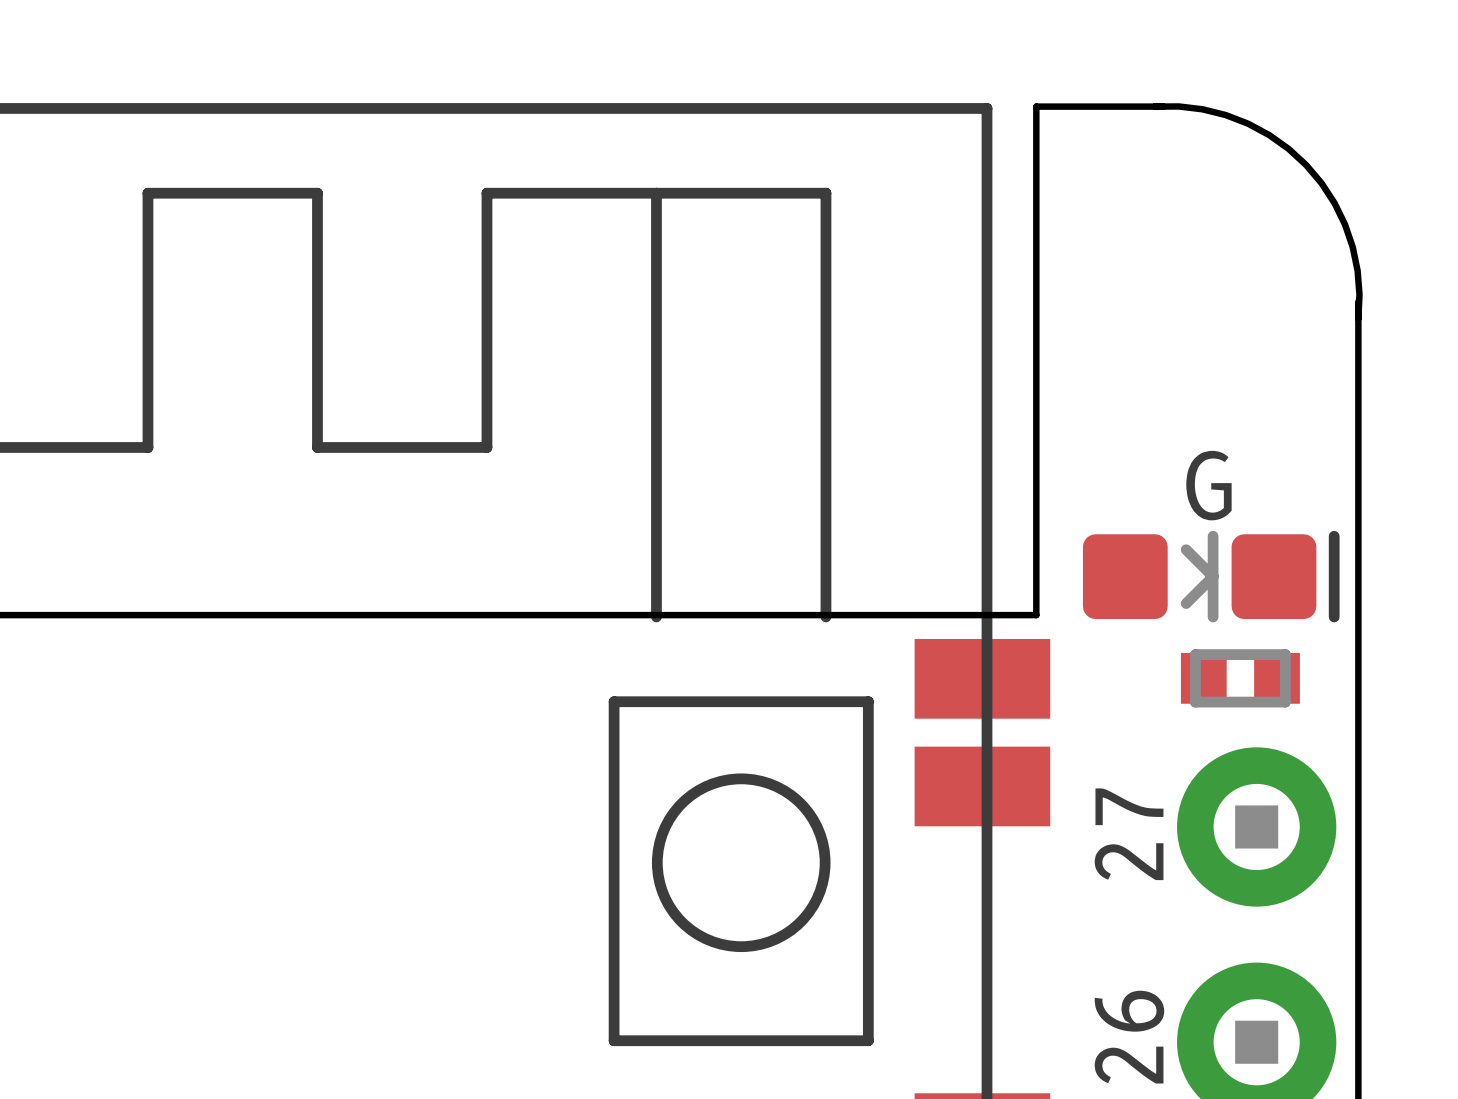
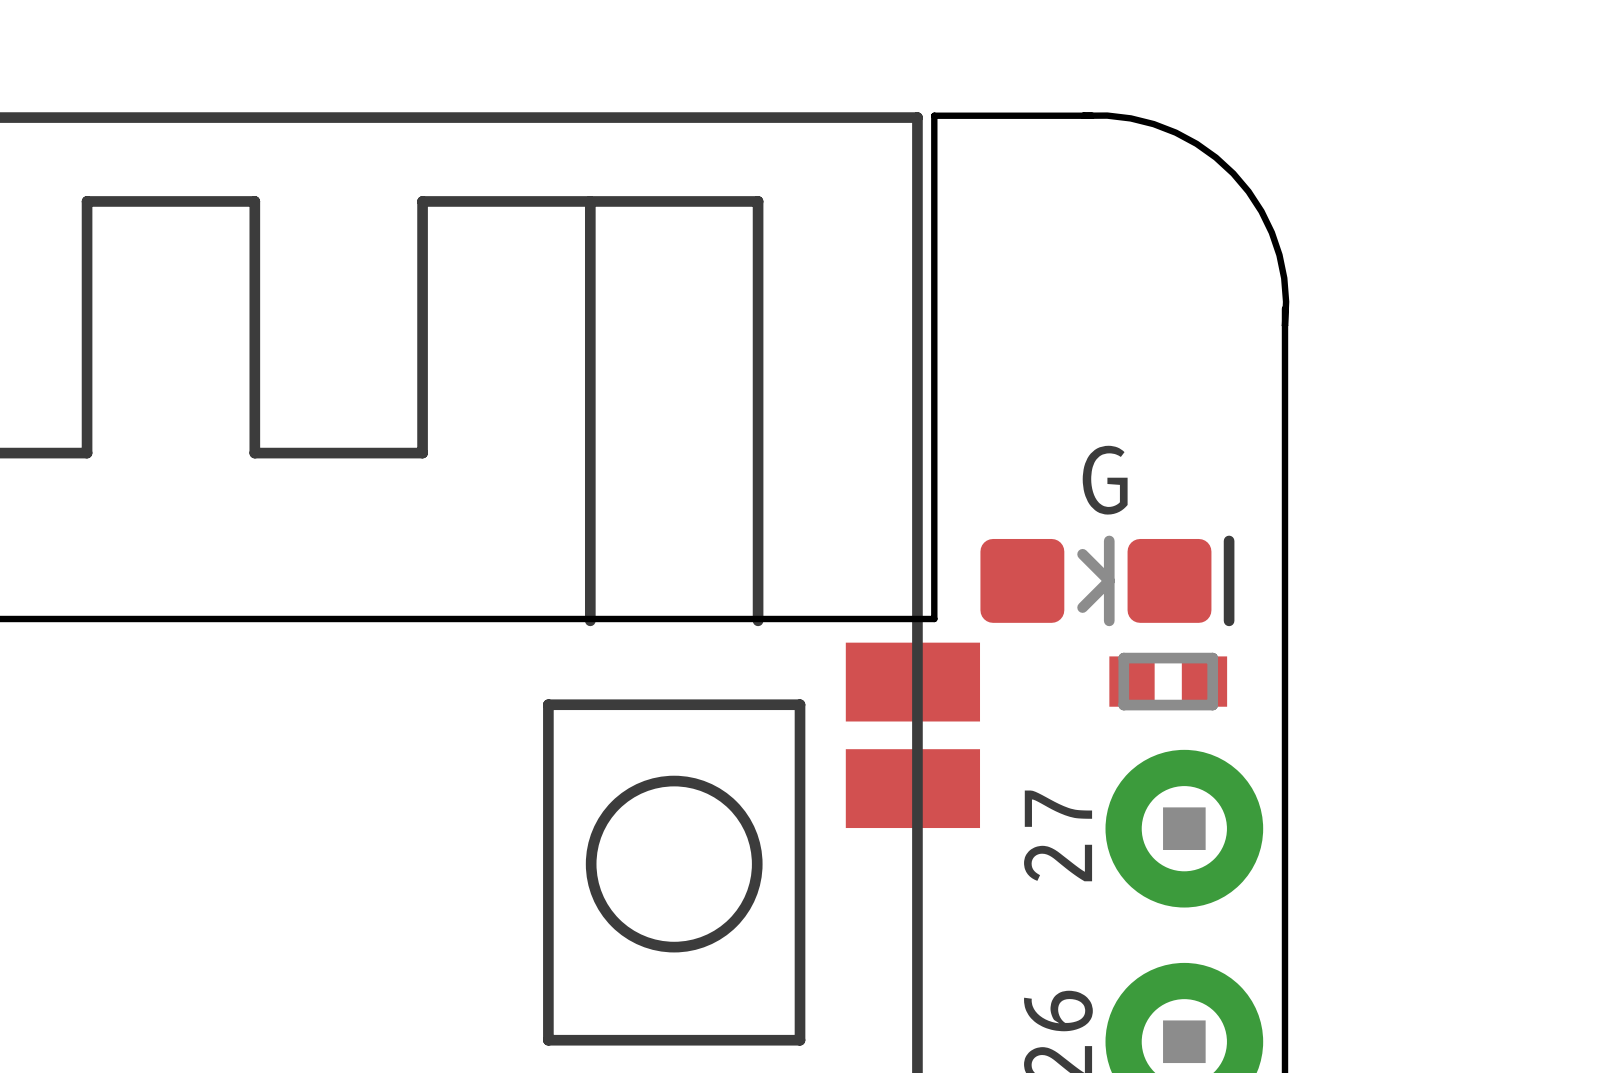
board edge: (1036, 106) (1036, 615) (1004, 615) -> (966, 115) (934, 115) (934, 619)
text position: G (1208, 485) -> G (1105, 480)
part position: (1211, 576) -> (1107, 580)

